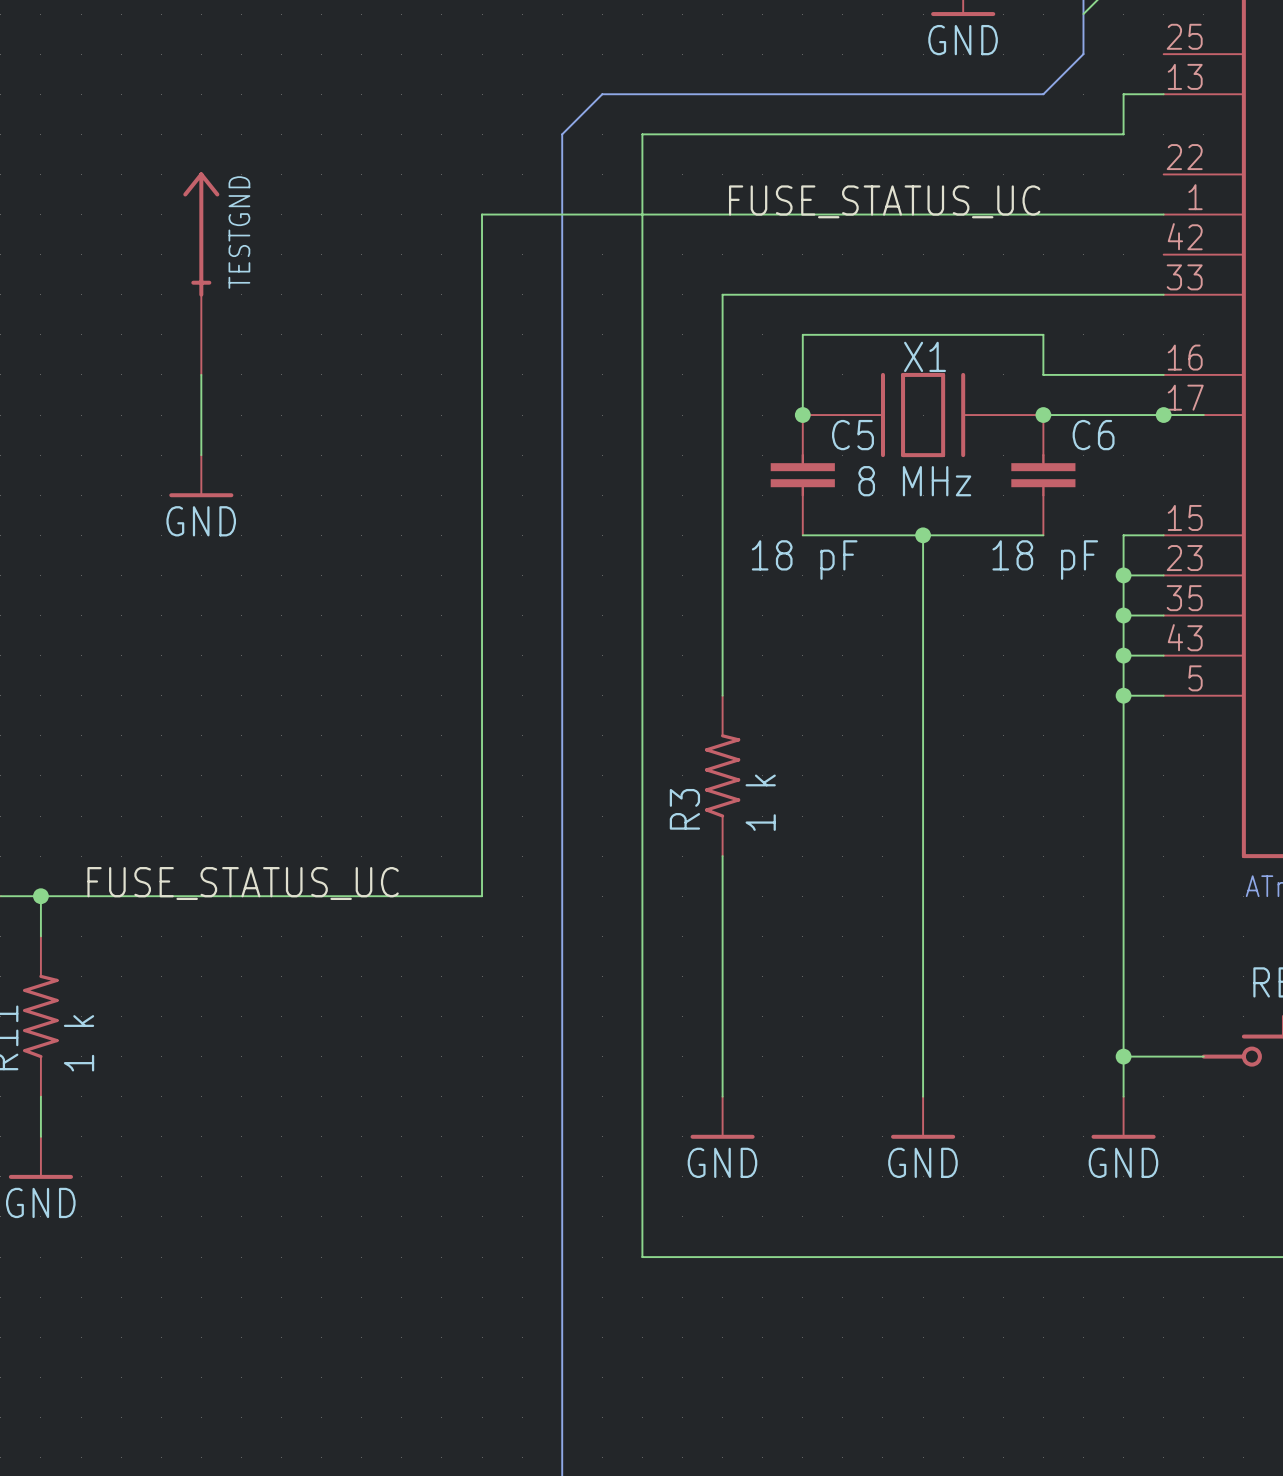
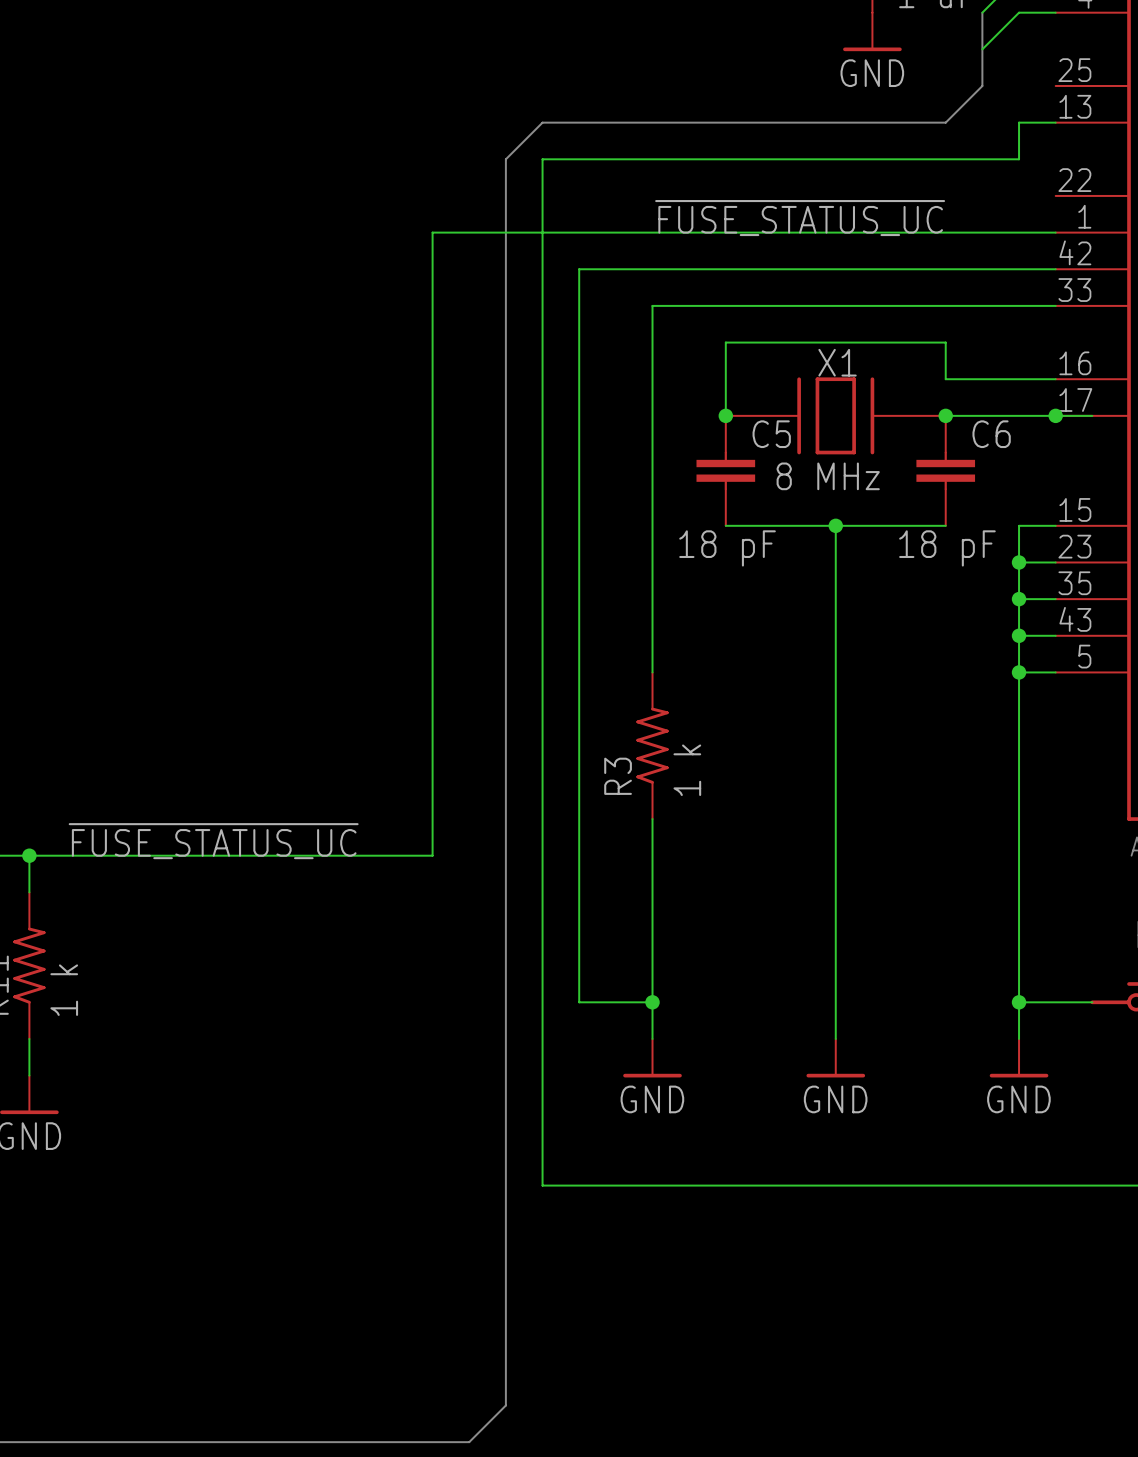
wire: (642, 134) (642, 254) -> (1055, 269) (579, 269)
wire: none -> (579, 159) (542, 159) (542, 1185) (579, 1185)
label: FUSE_STATUS_UC (884, 201) -> ~{FUSE_STATUS_UC} (800, 218)
TESTGND: (201, 273) -> none
wire: (201, 374) (201, 455) -> none
power symbol: GND (201, 476) -> none
label: FUSE_STATUS_UC (243, 883) -> ~{FUSE_STATUS_UC} (213, 841)
wire: (642, 1056) (642, 1257) -> (579, 1002) (652, 1002)
junction: none -> (652, 1002)

